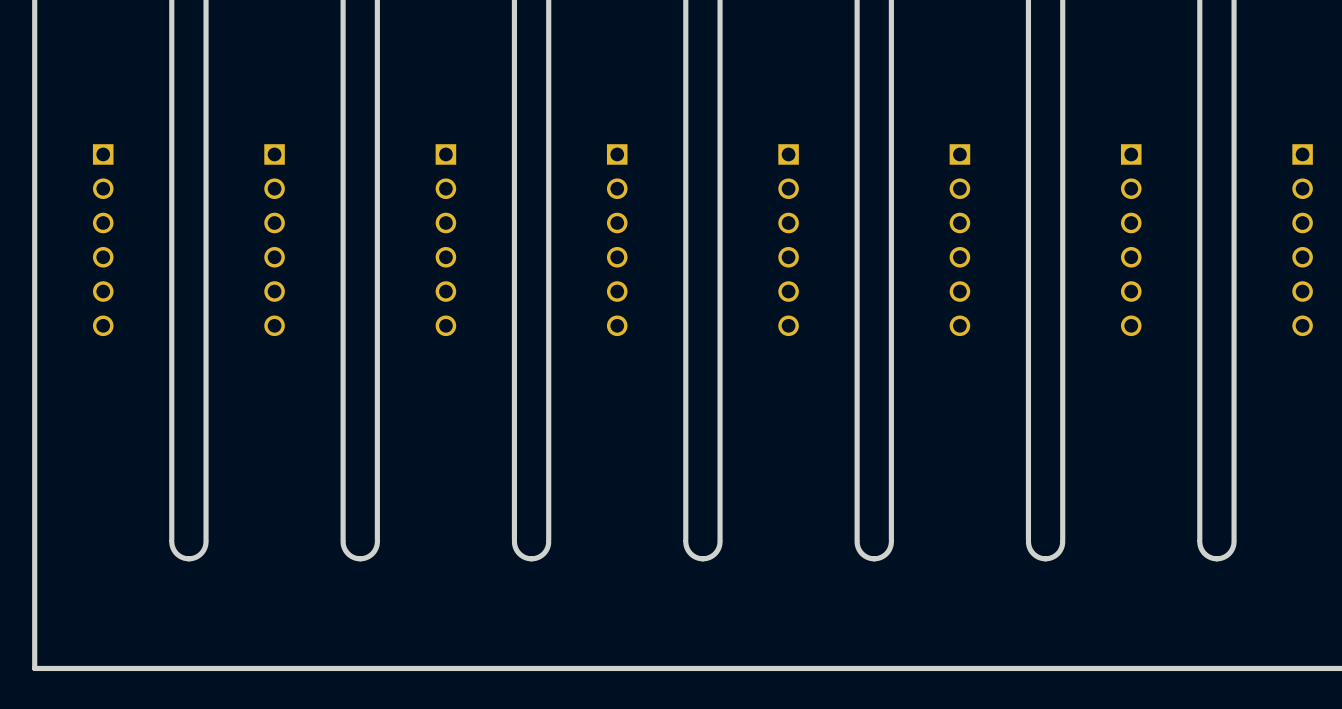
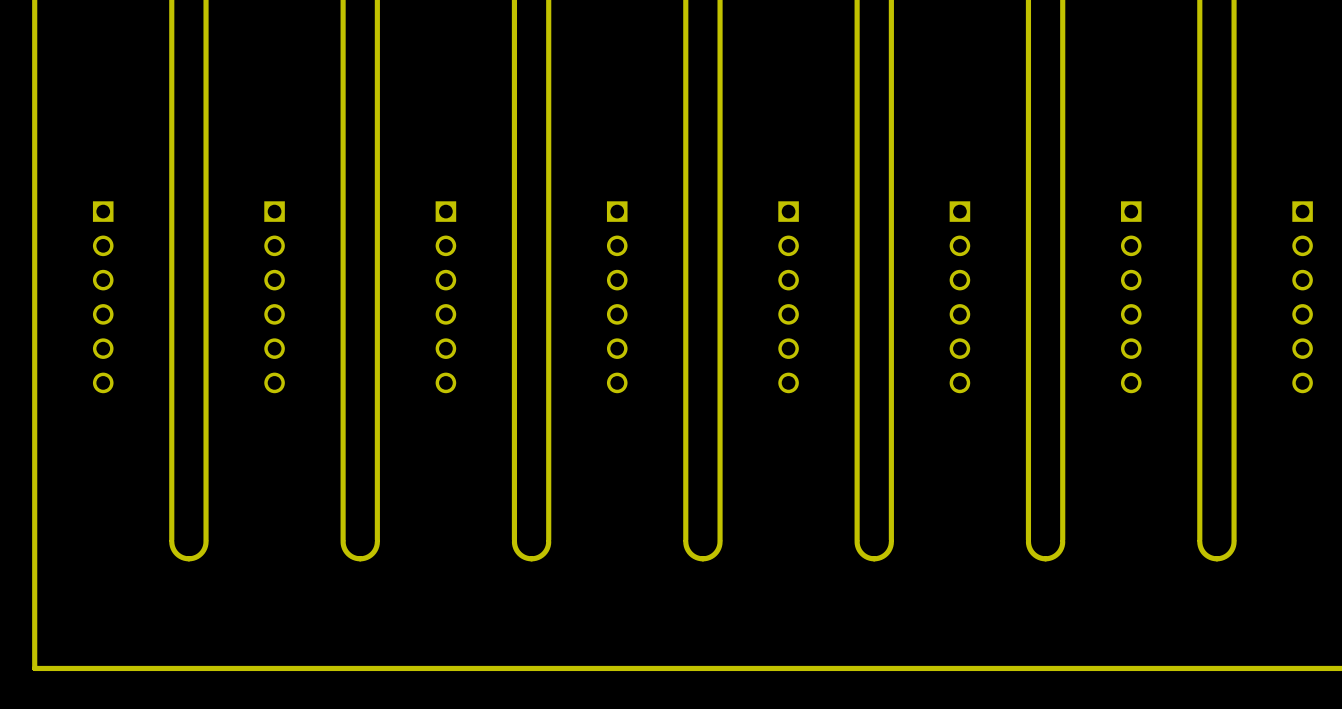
part position: (103, 240) -> (103, 297)
part position: (274, 240) -> (274, 297)
part position: (445, 240) -> (445, 297)
part position: (617, 240) -> (617, 297)
part position: (788, 240) -> (788, 297)
part position: (959, 240) -> (959, 297)
part position: (1131, 240) -> (1131, 297)
part position: (1302, 240) -> (1302, 297)

